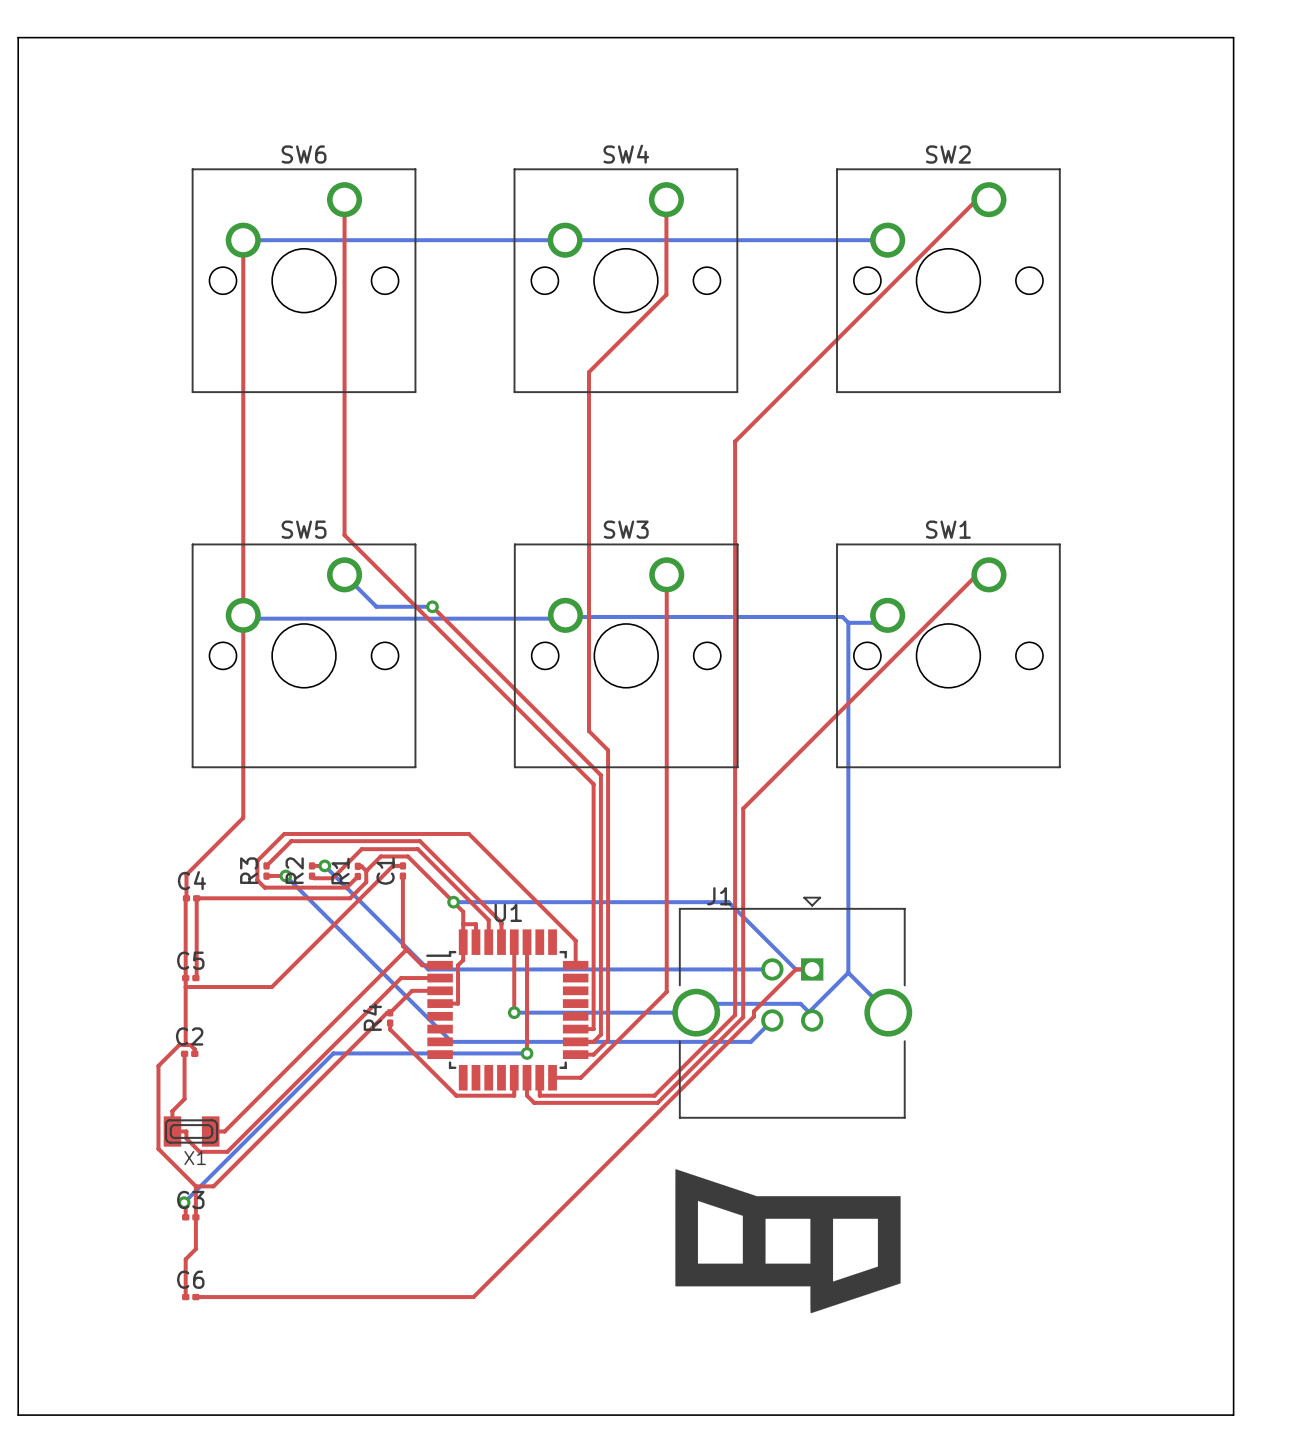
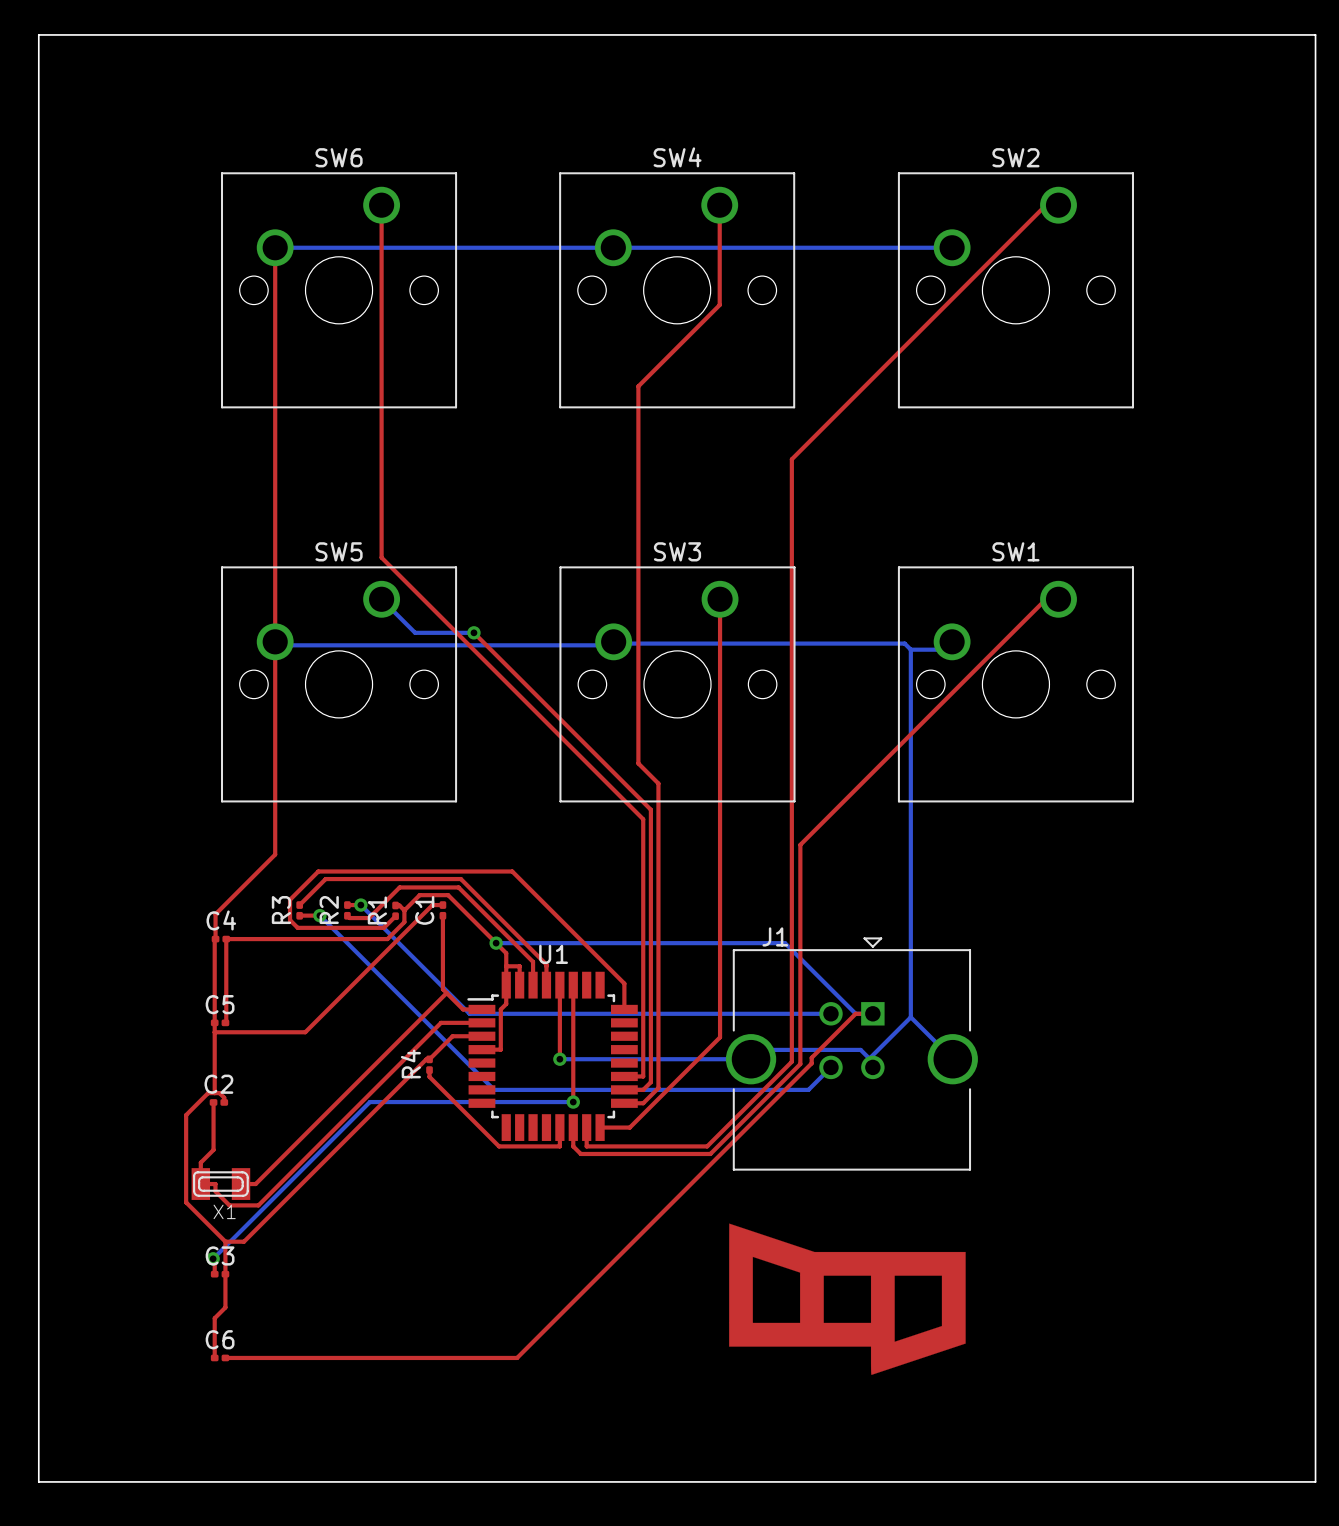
drawing shape: [675, 1169, 901, 1314] -> [729, 1223, 966, 1375]

